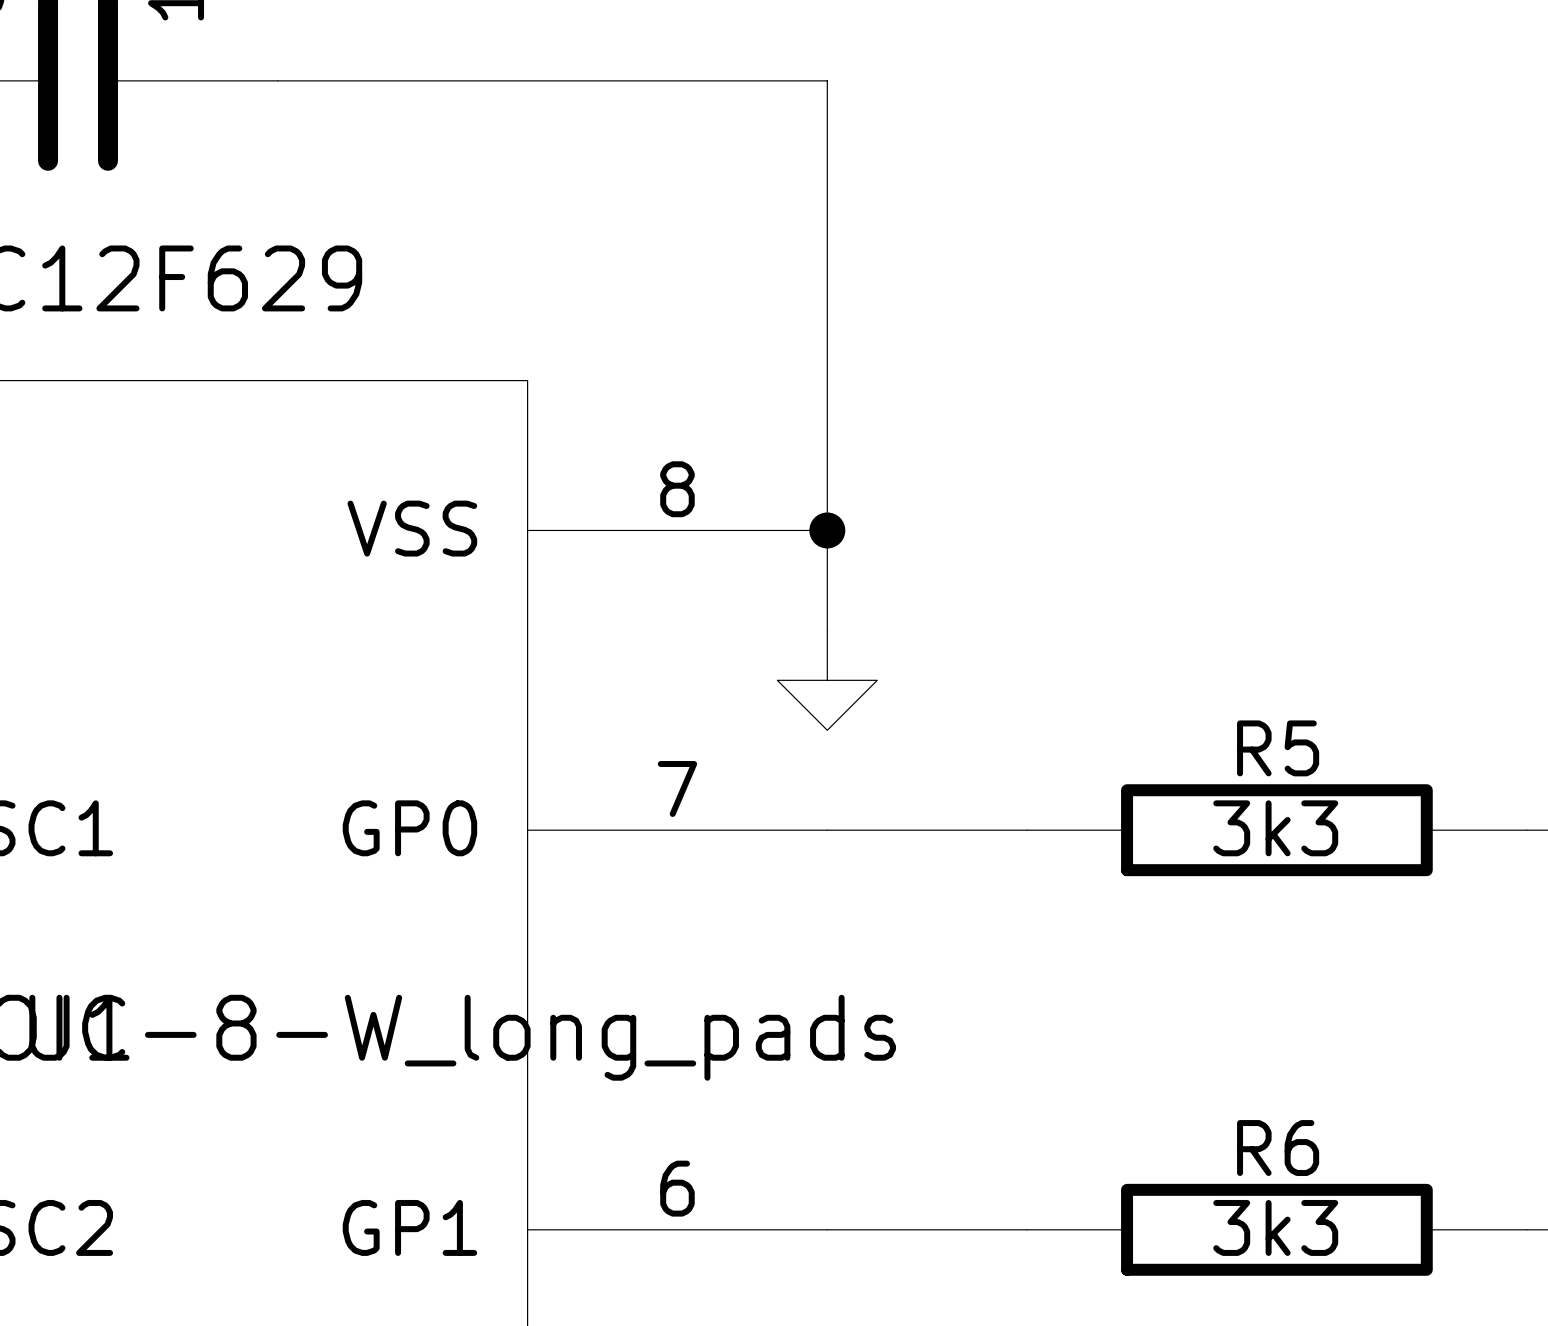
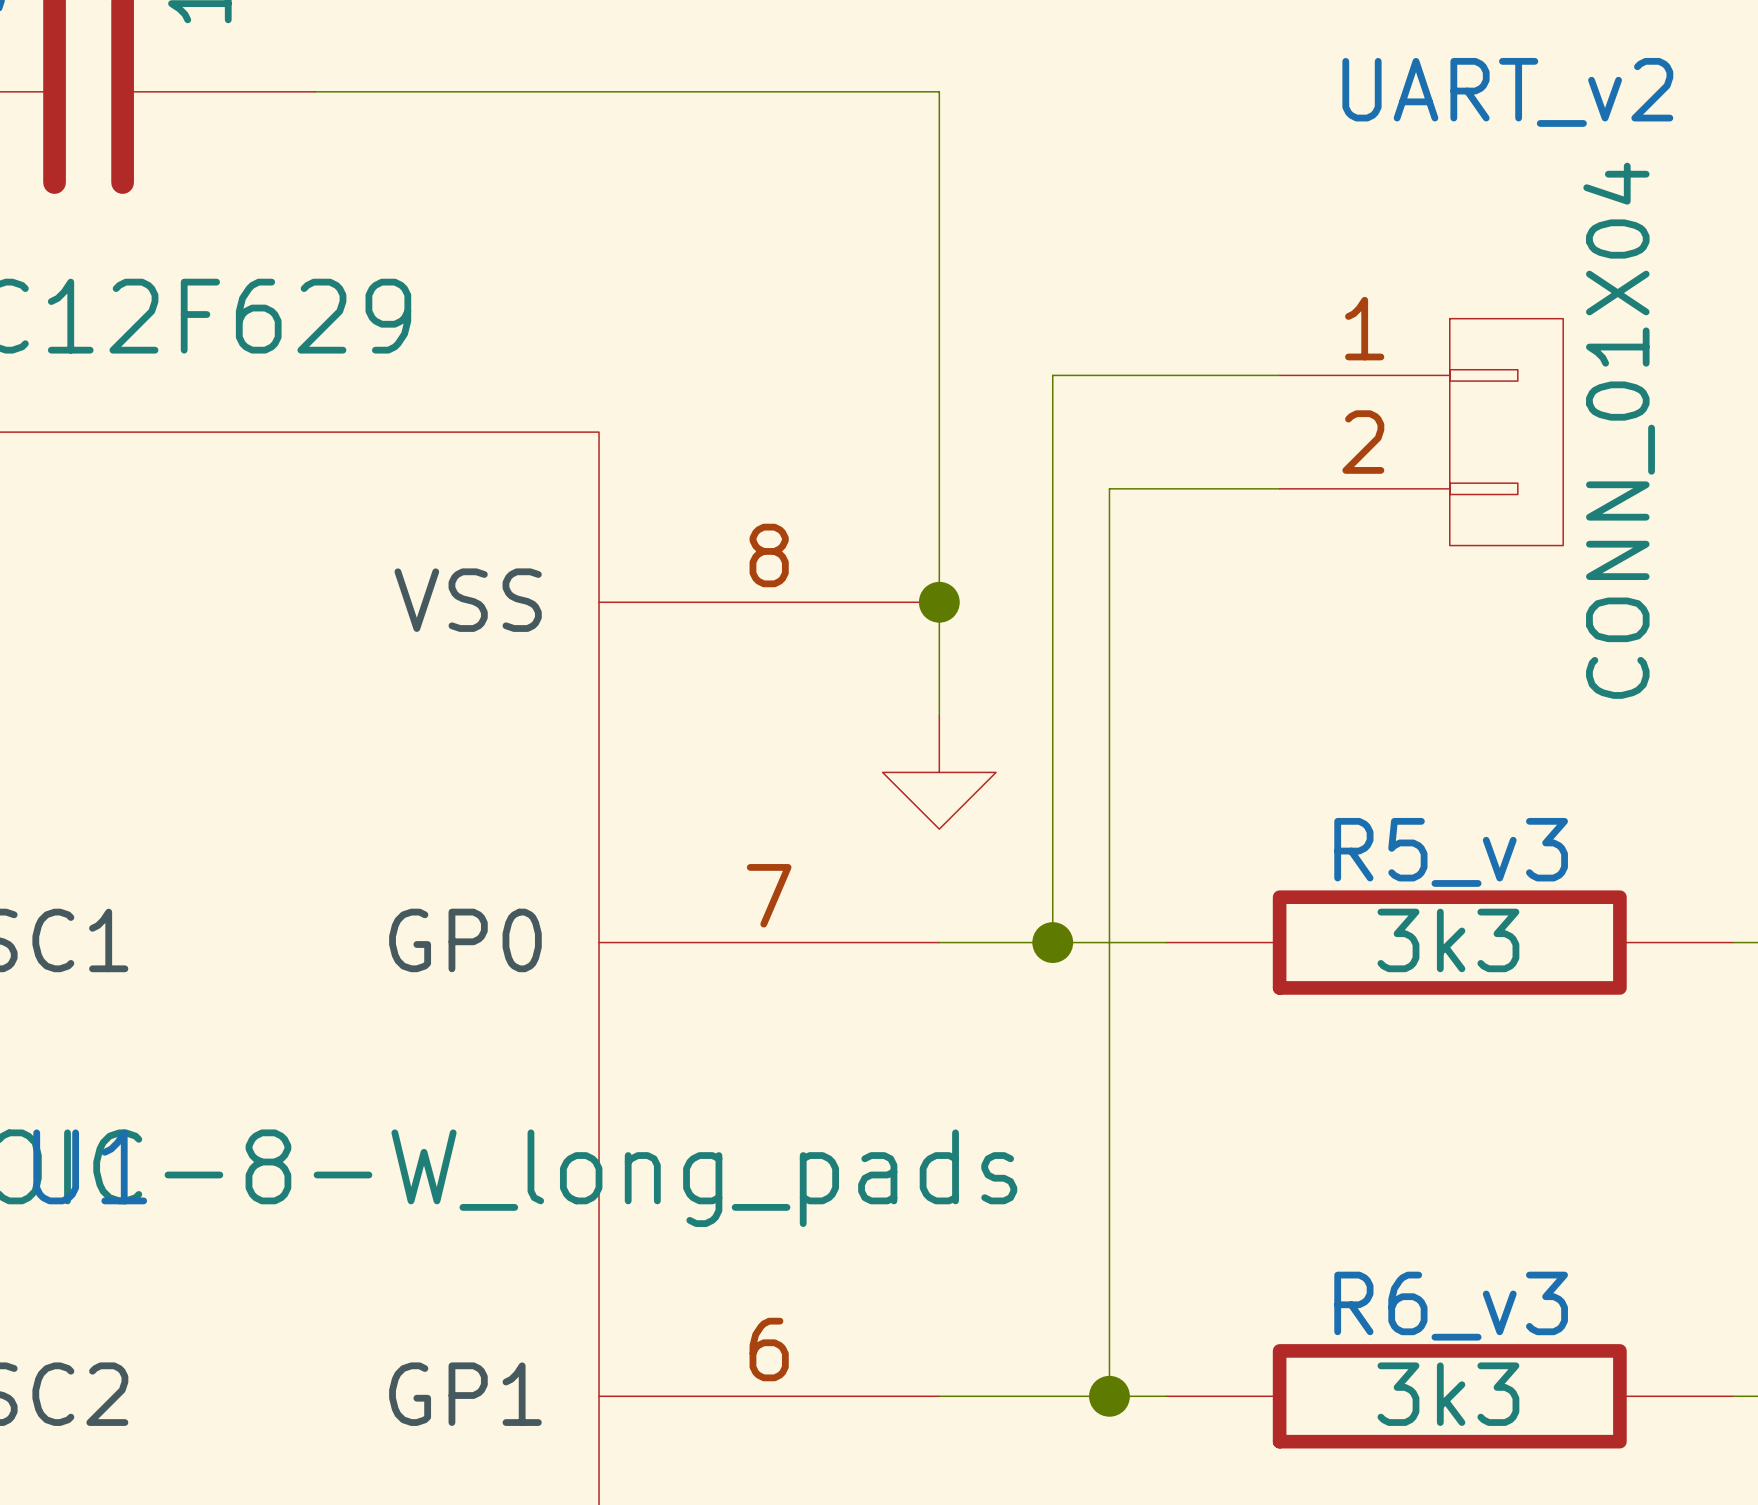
wire: none -> (1279, 375) (1052, 375) (1052, 942)
UART_v2: none -> CONN_01X04 (1421, 432)
wire: none -> (1279, 488) (1109, 488) (1109, 1396)
R5 name: R5 (1278, 748) -> R5_v3 (1451, 852)
junction: none -> (1052, 942)
R6 name: R6 (1278, 1148) -> R6_v3 (1451, 1306)
junction: none -> (1109, 1396)

